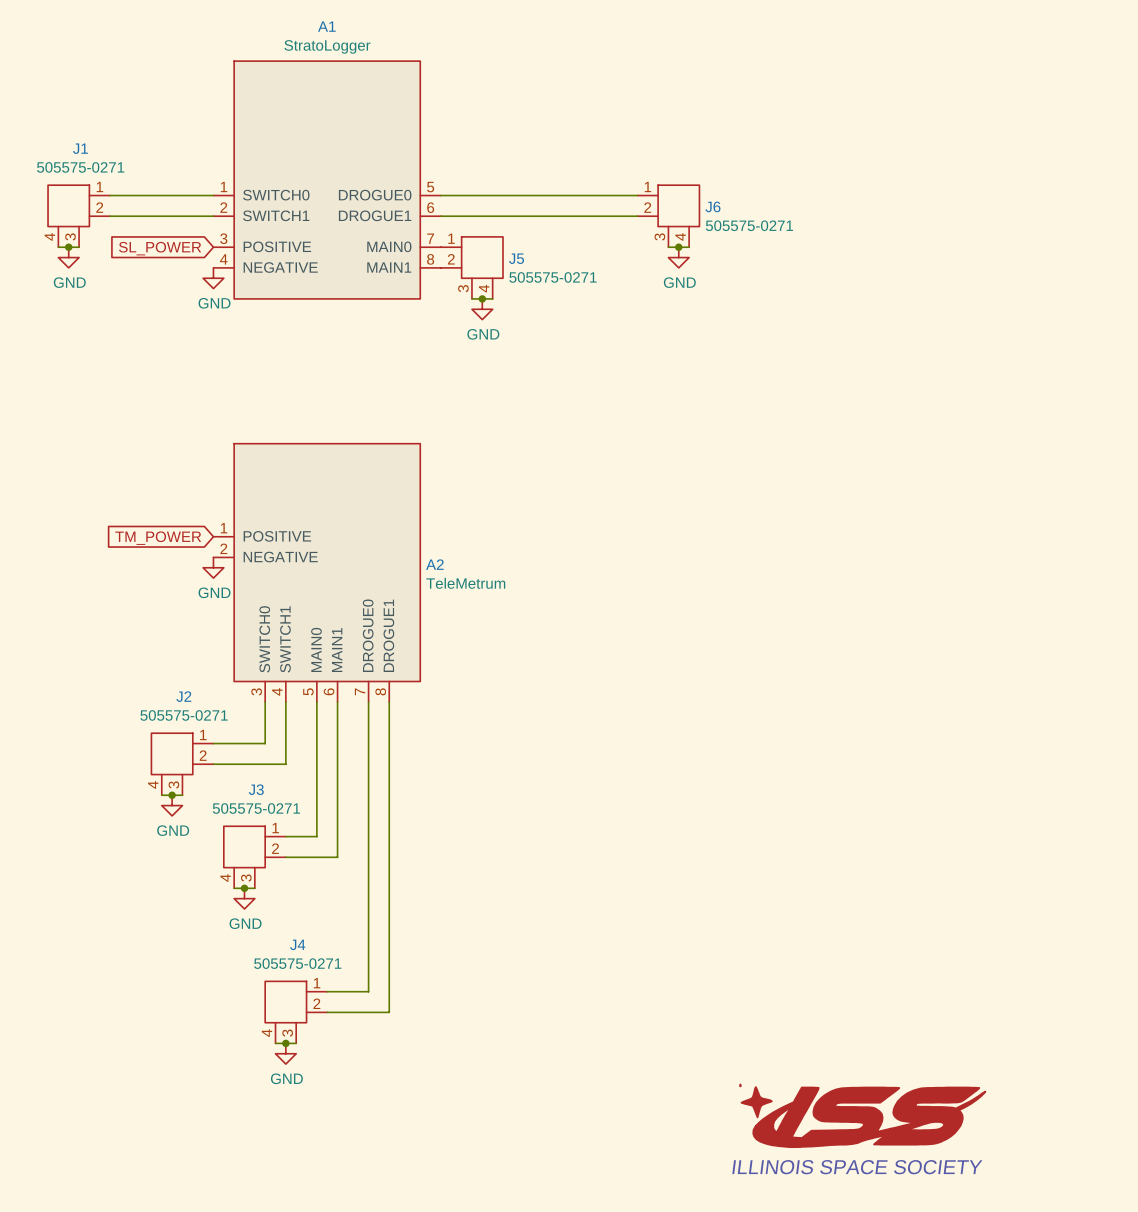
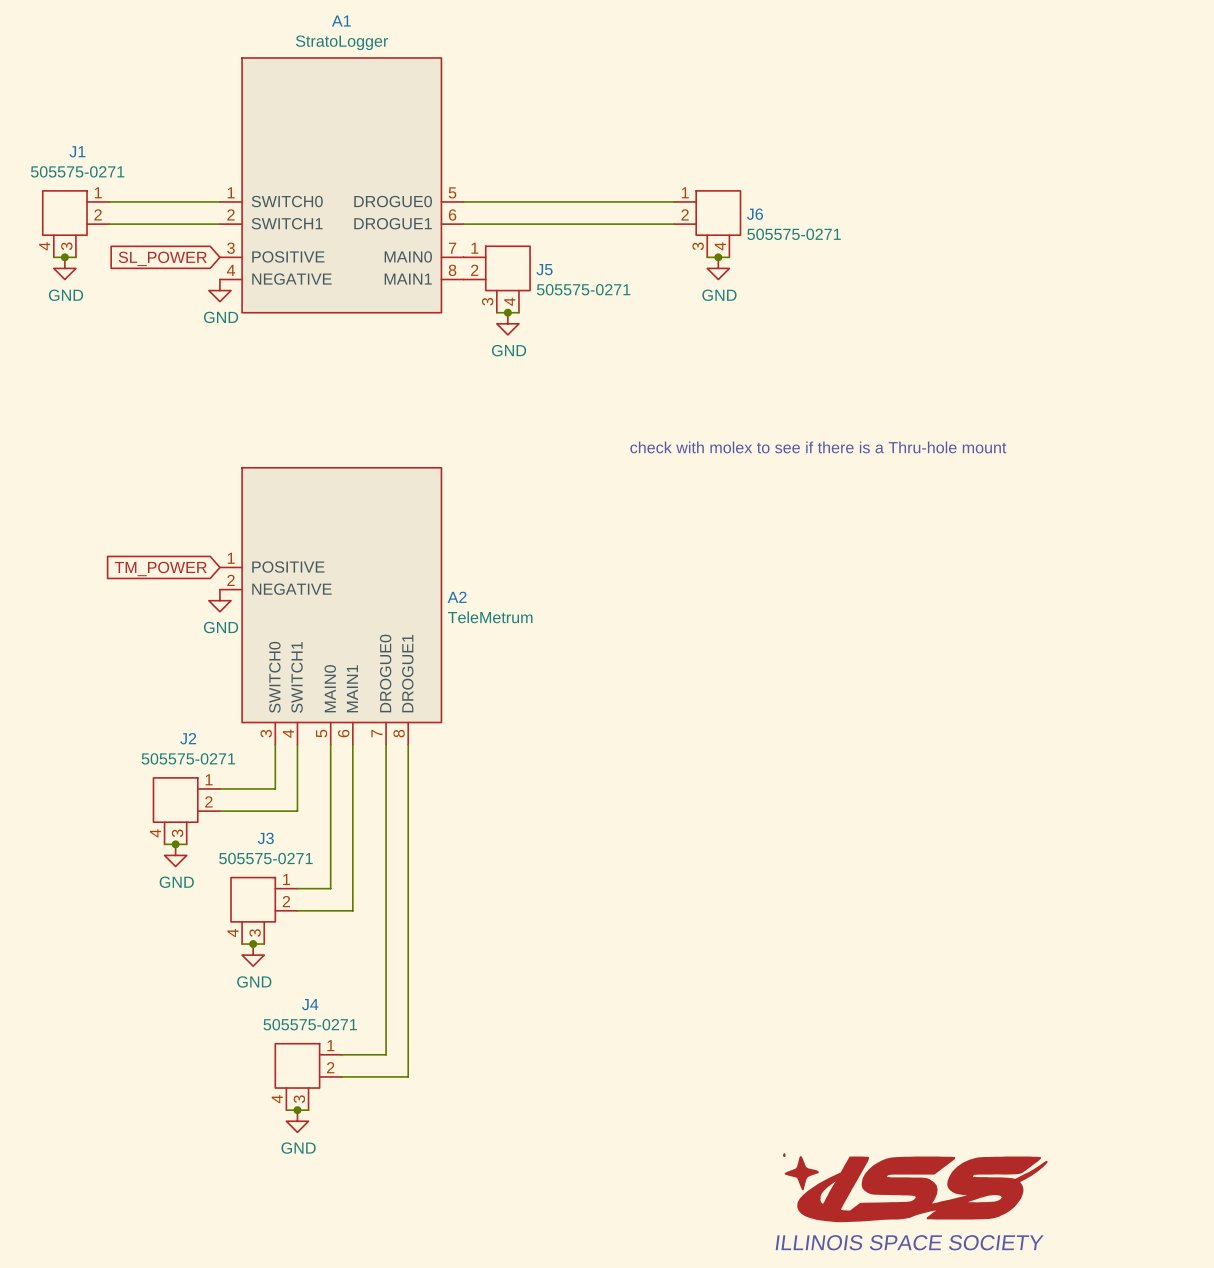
text: none -> check with molex to see if there is a Thru-hole mount (818, 447)

